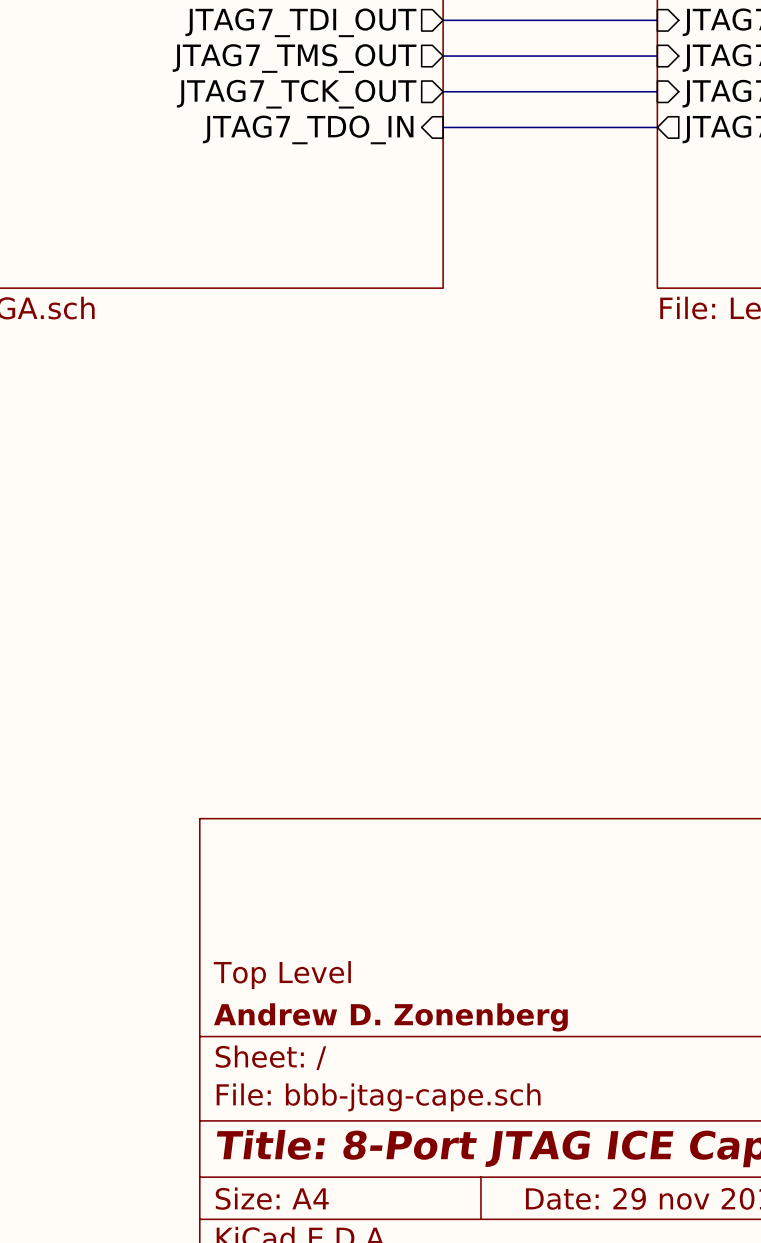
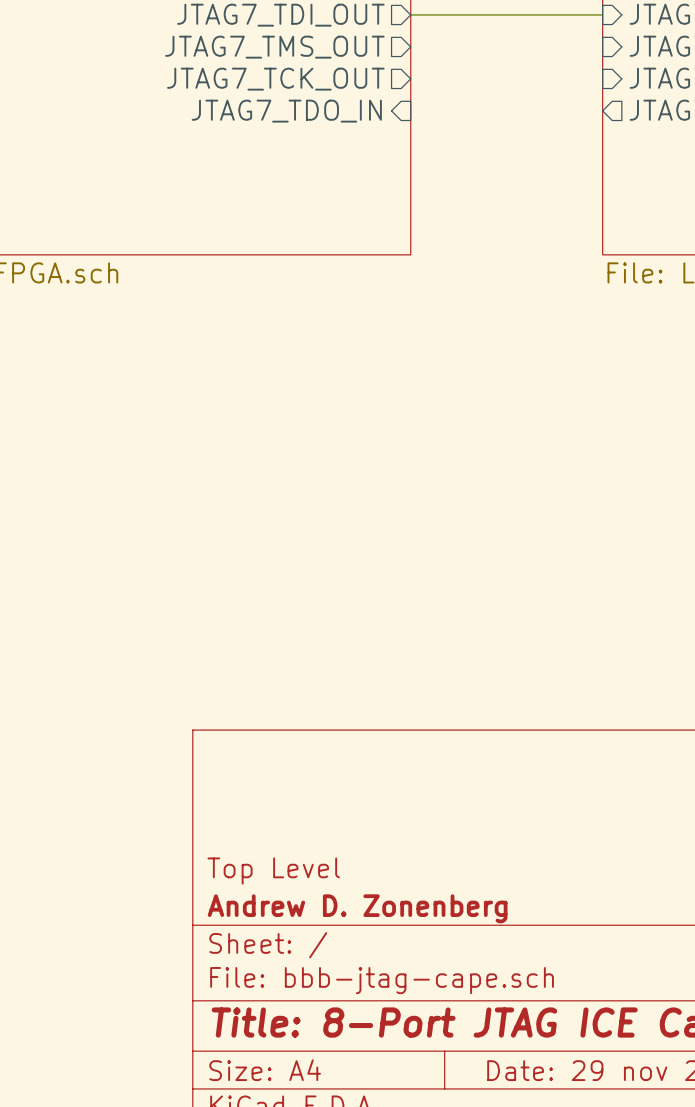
wire: (443, 56) (657, 56) -> none
wire: (443, 91) (657, 91) -> none
wire: (443, 127) (657, 127) -> none

